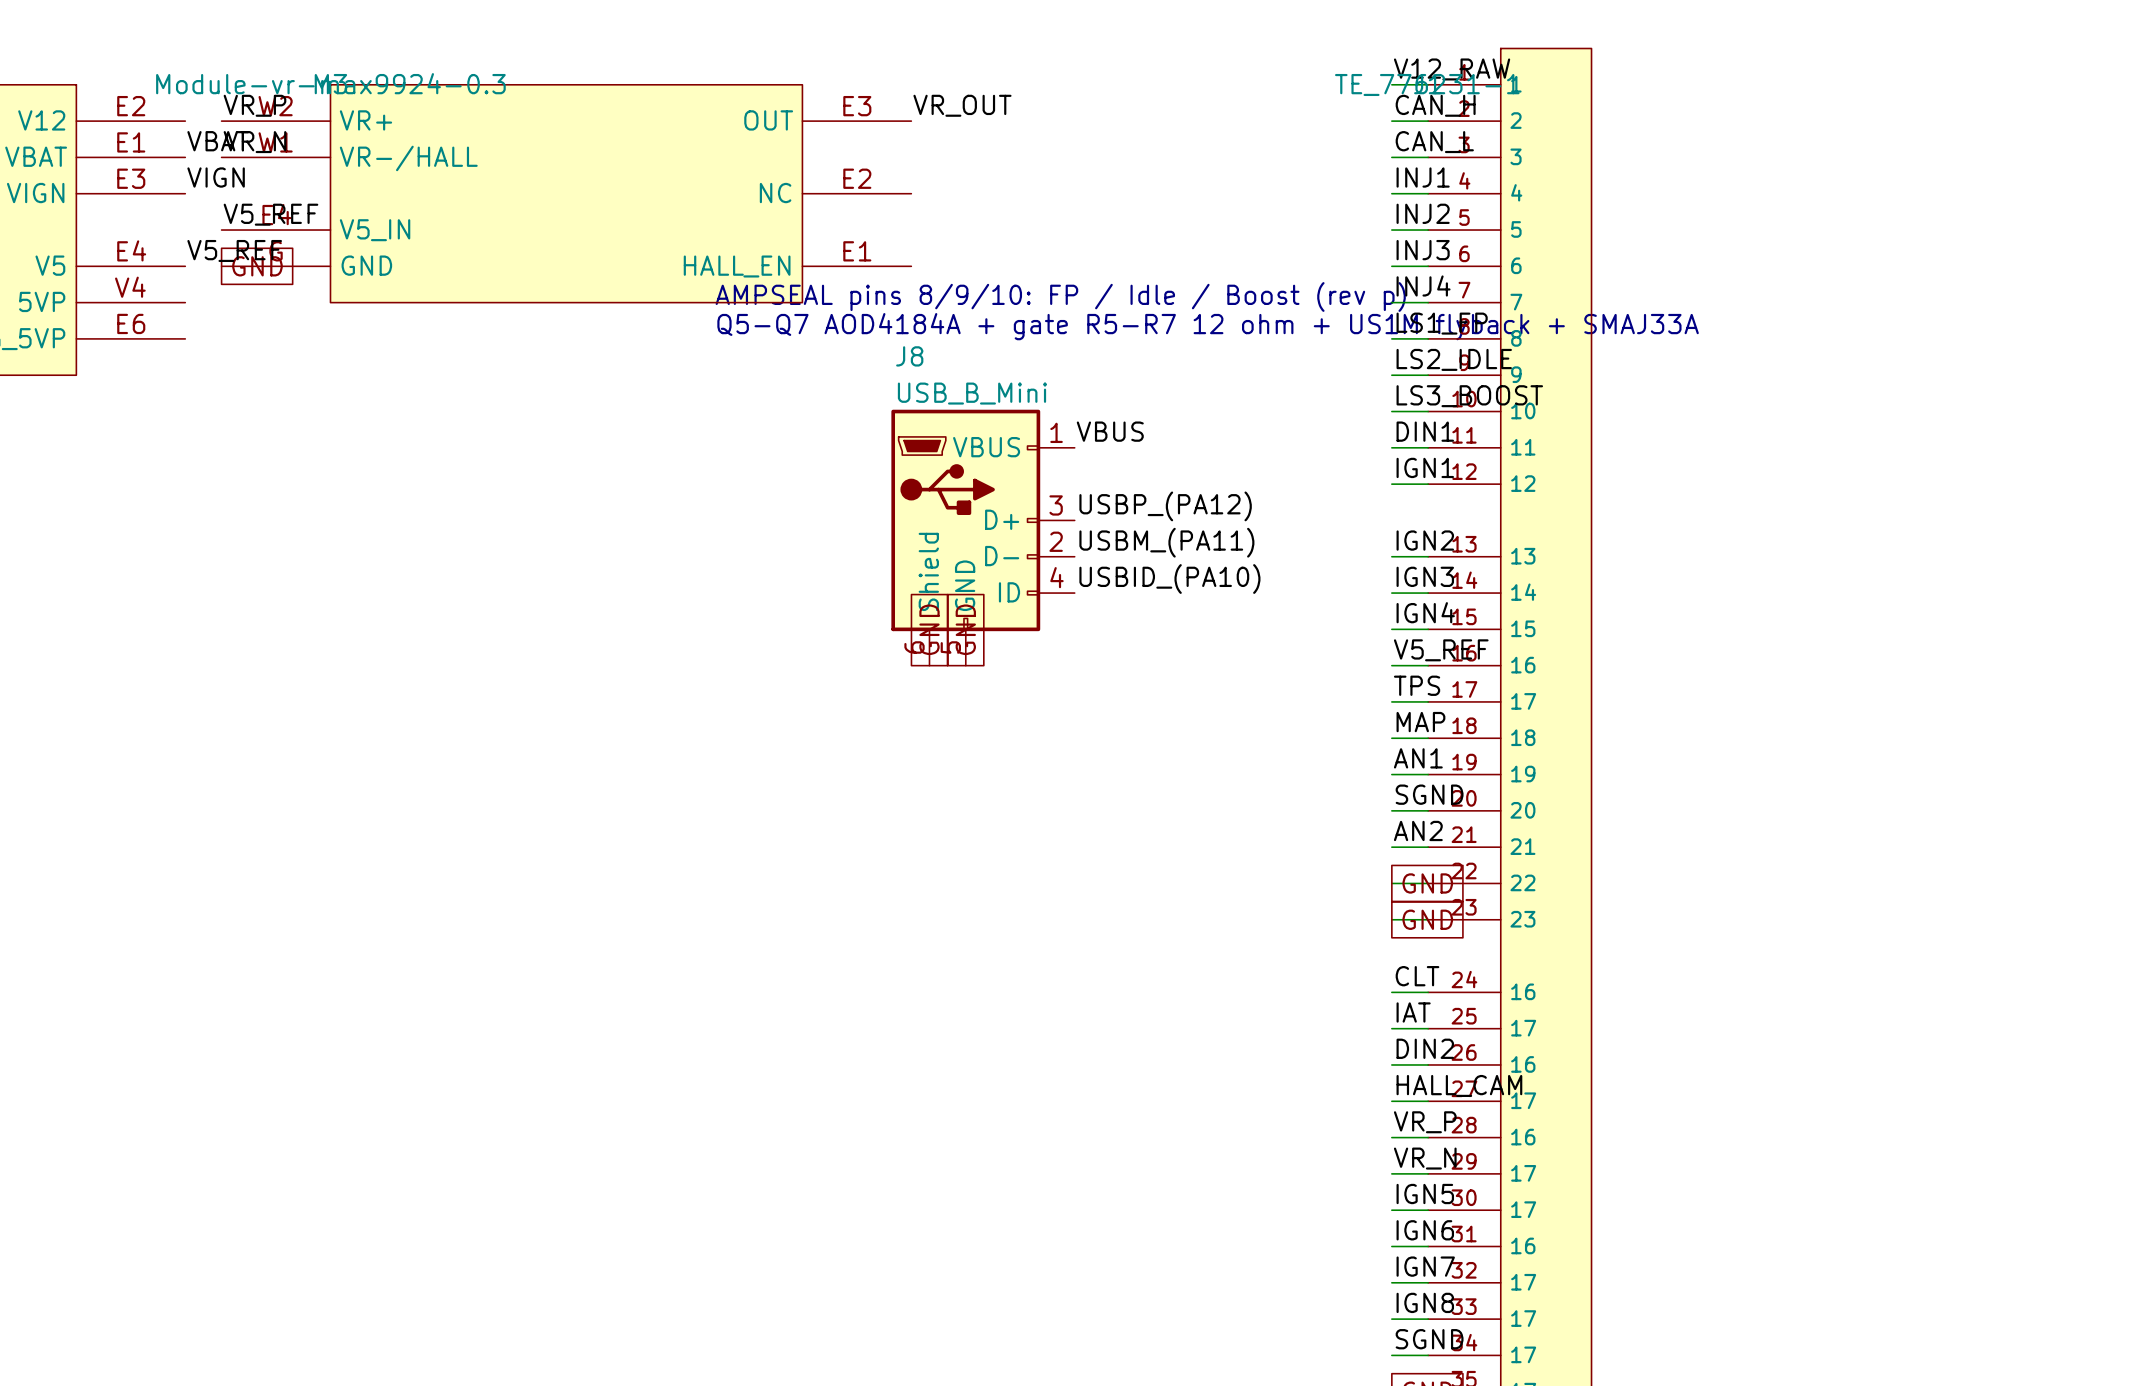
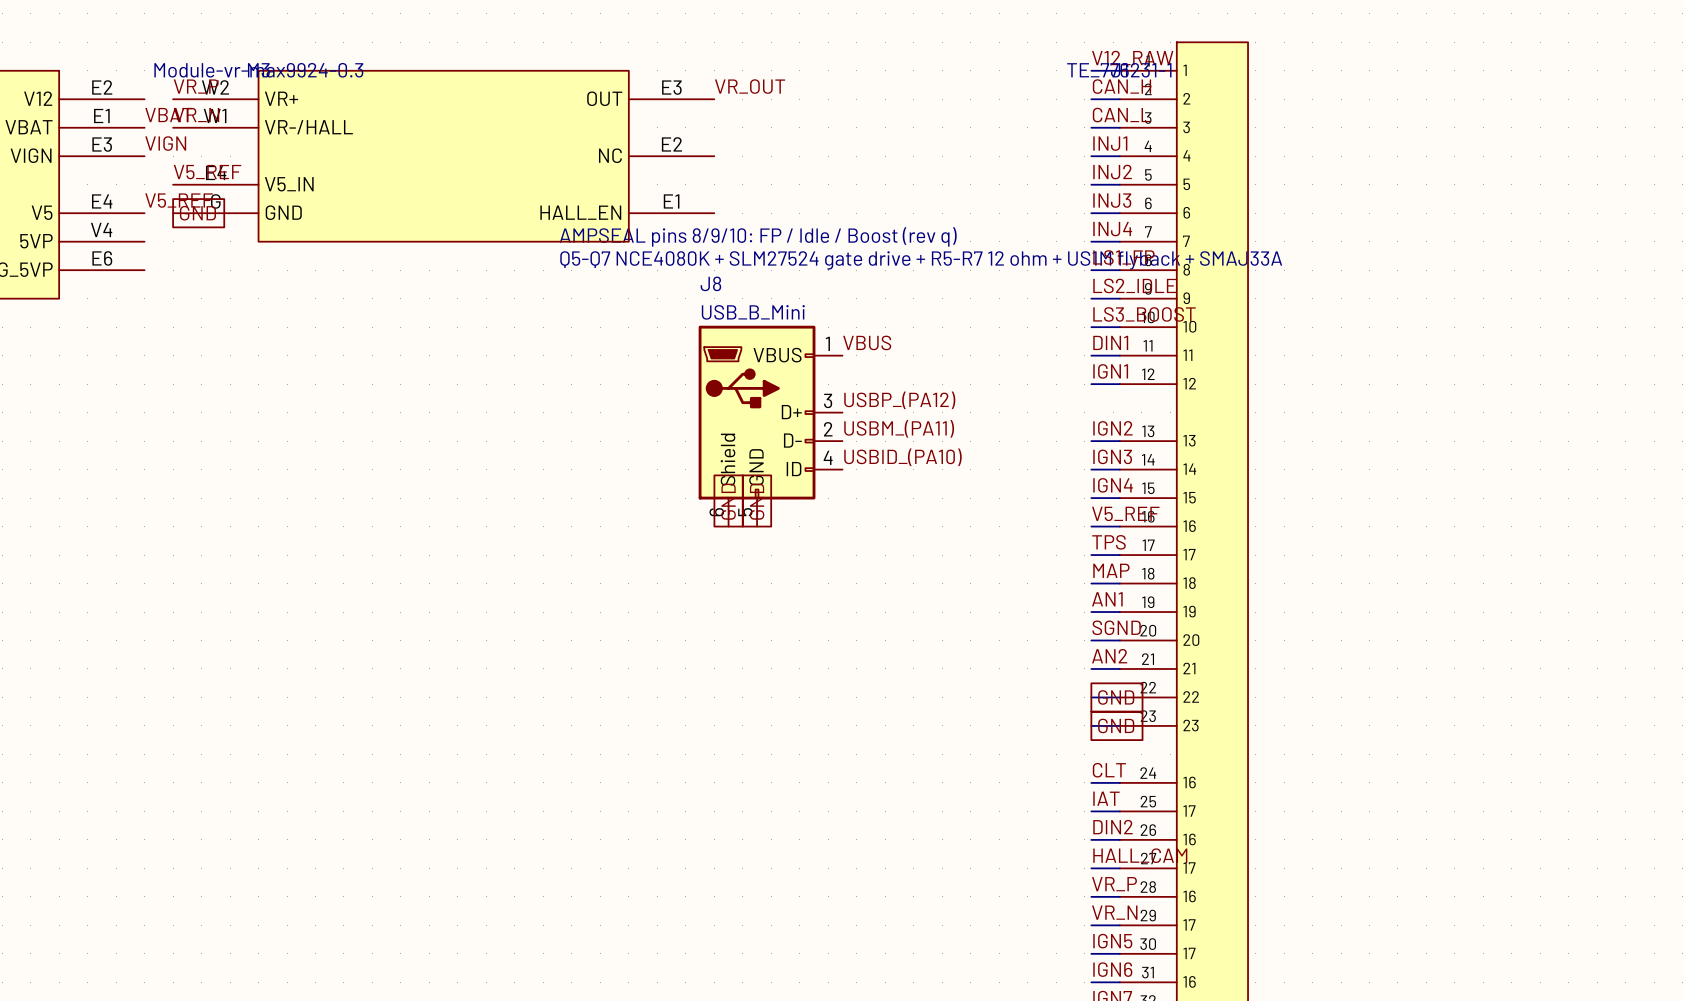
text: AMPSEAL pins 8/9/10: FP / Idle / Boost (rev p) (1060, 296) -> AMPSEAL pins 8/9/10: FP / Idle / Boost (rev q) (758, 236)
text: Q5-Q7 AOD4184A + gate R5-R7 12 ohm + US1M flyback + SMAJ33A (1208, 326) -> Q5-Q7 NCE4080K + SLM27524 gate drive + R5-R7 12 ohm + US1M flyback + SMAJ33A (921, 260)

